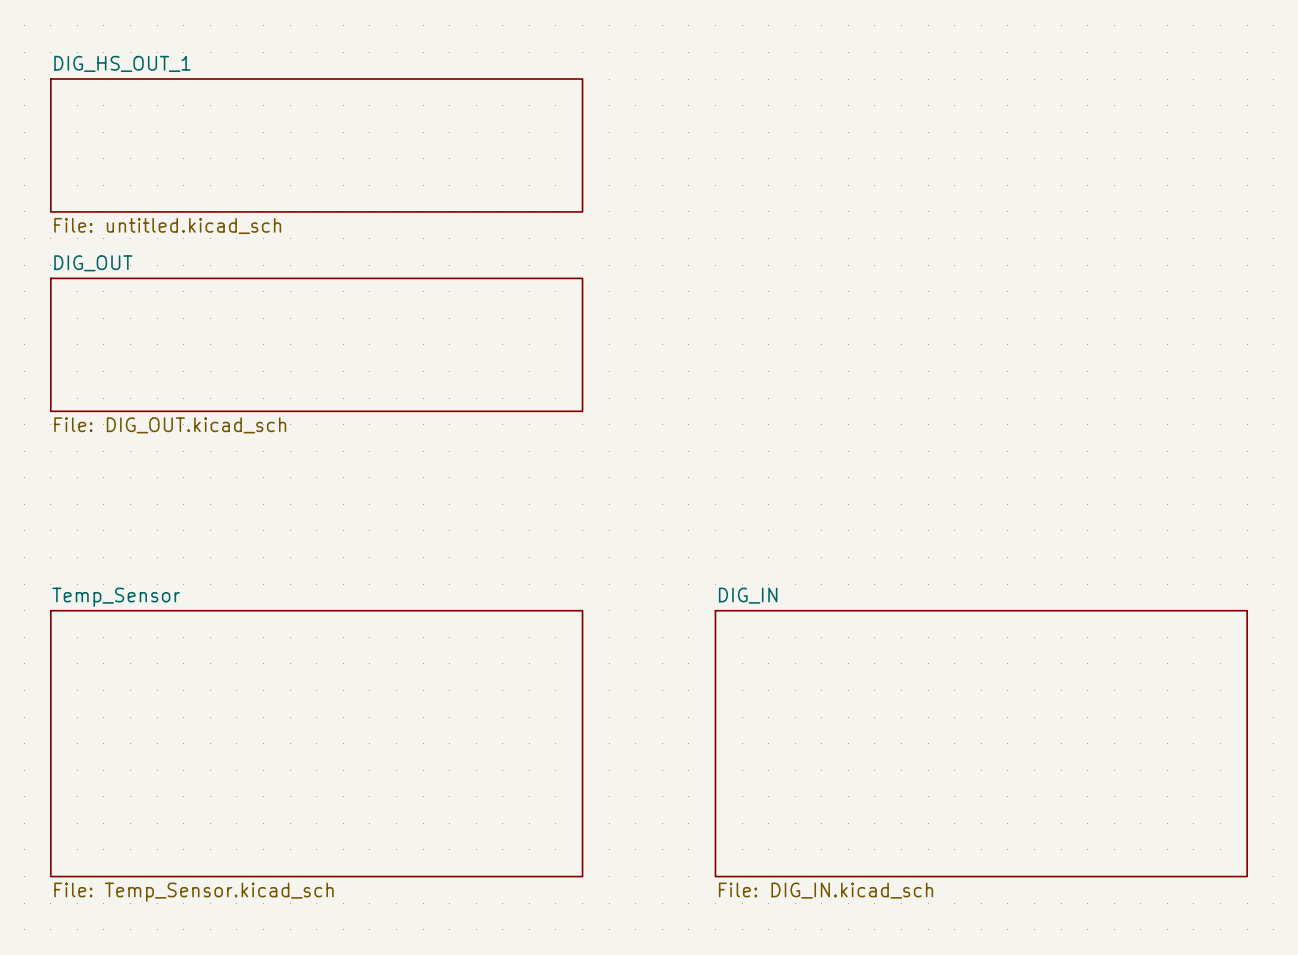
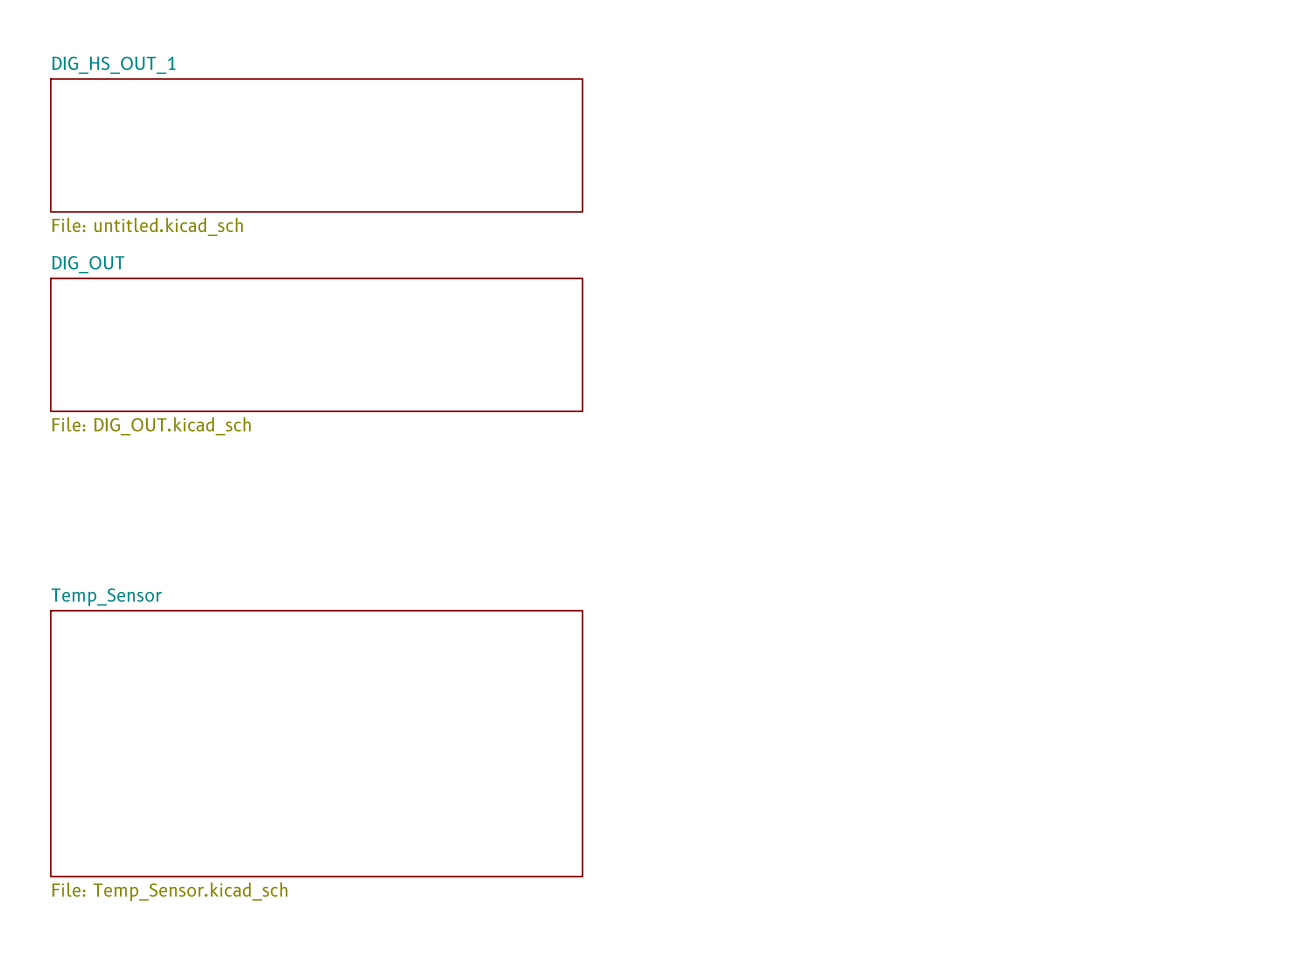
sheet DIG_IN: File: DIG_IN.kicad_sch (981, 743) -> none

